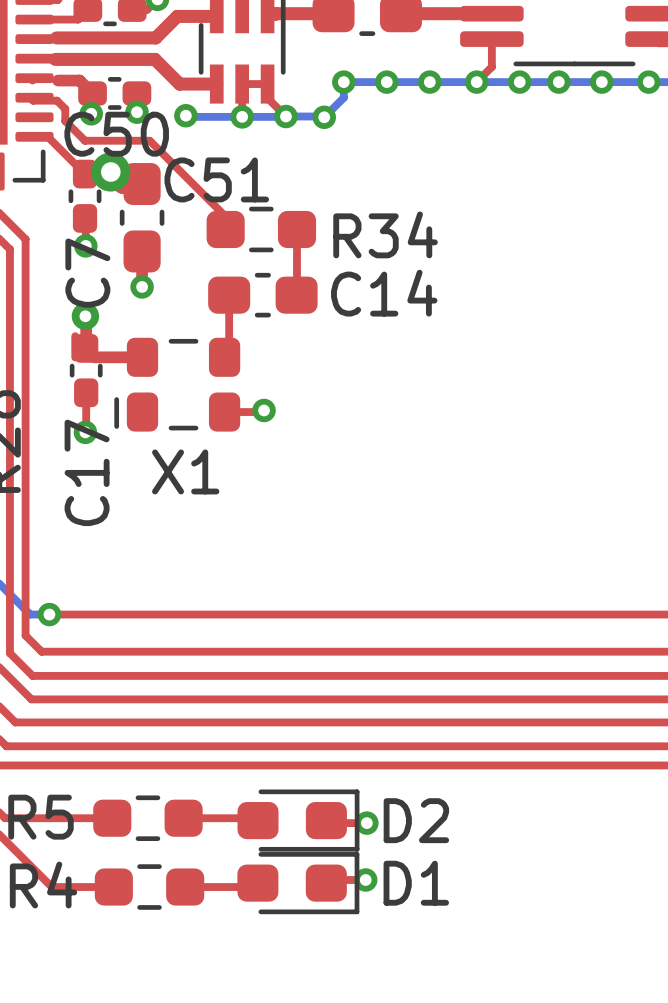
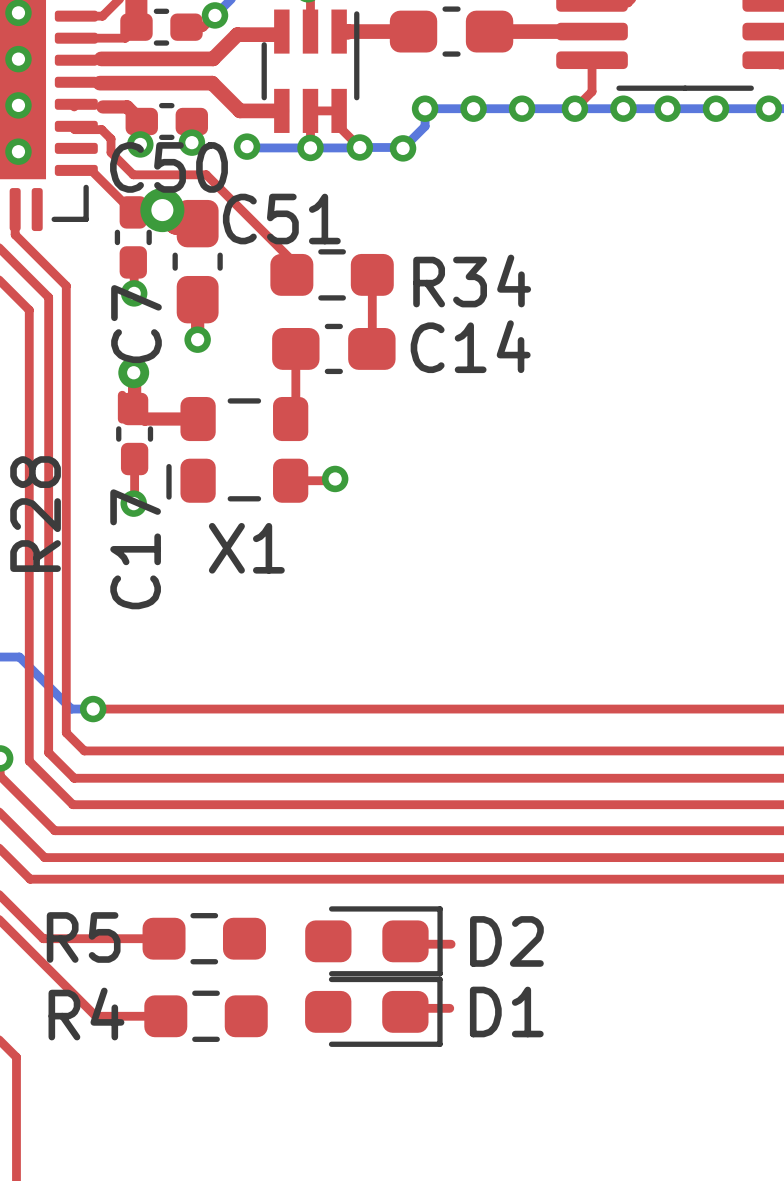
top track: (183, 818) (255, 818) (258, 820) -> none
via: (366, 823) -> none
via: (365, 879) -> none
top track: (257, 883) (253, 887) (185, 887) -> none

